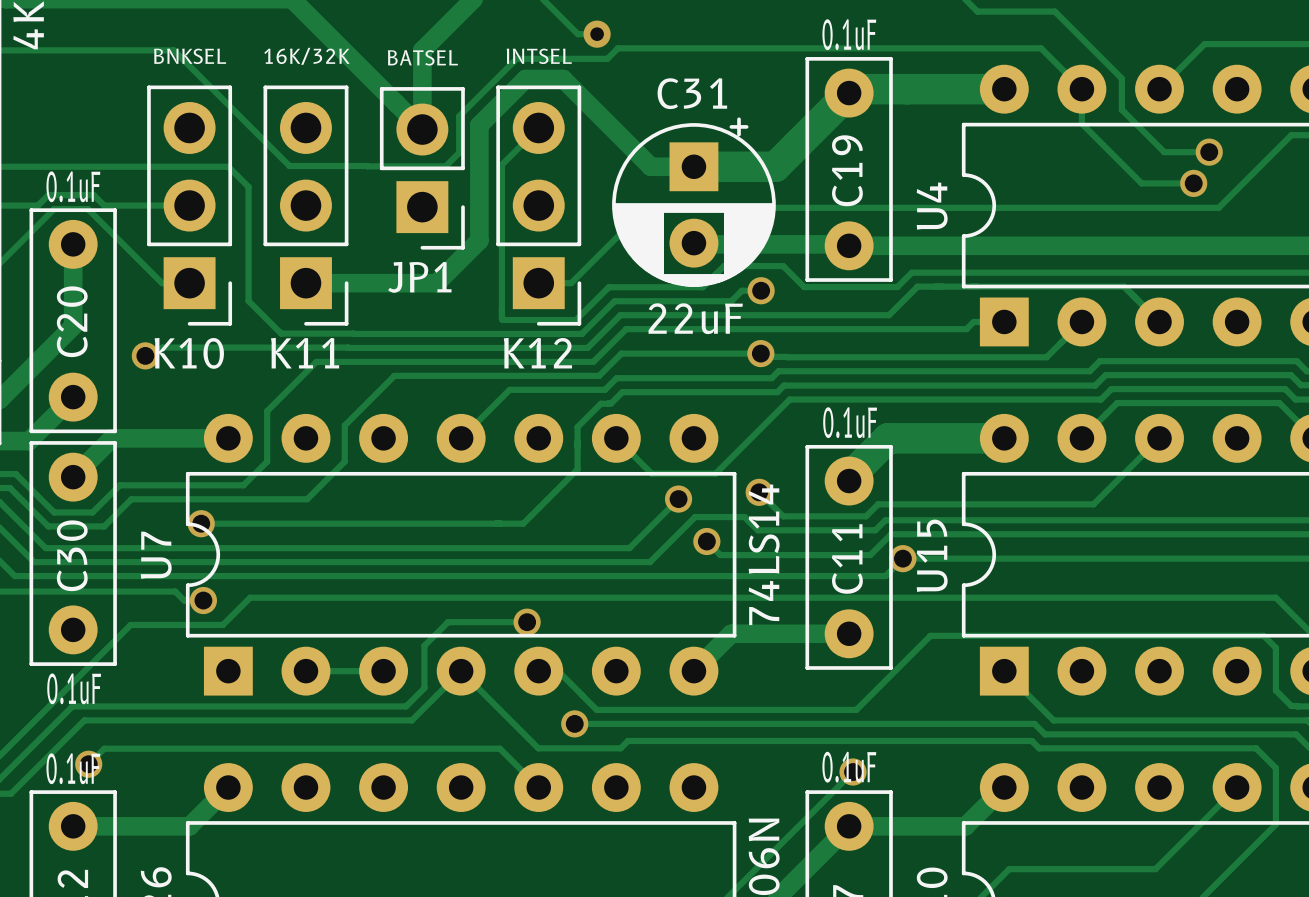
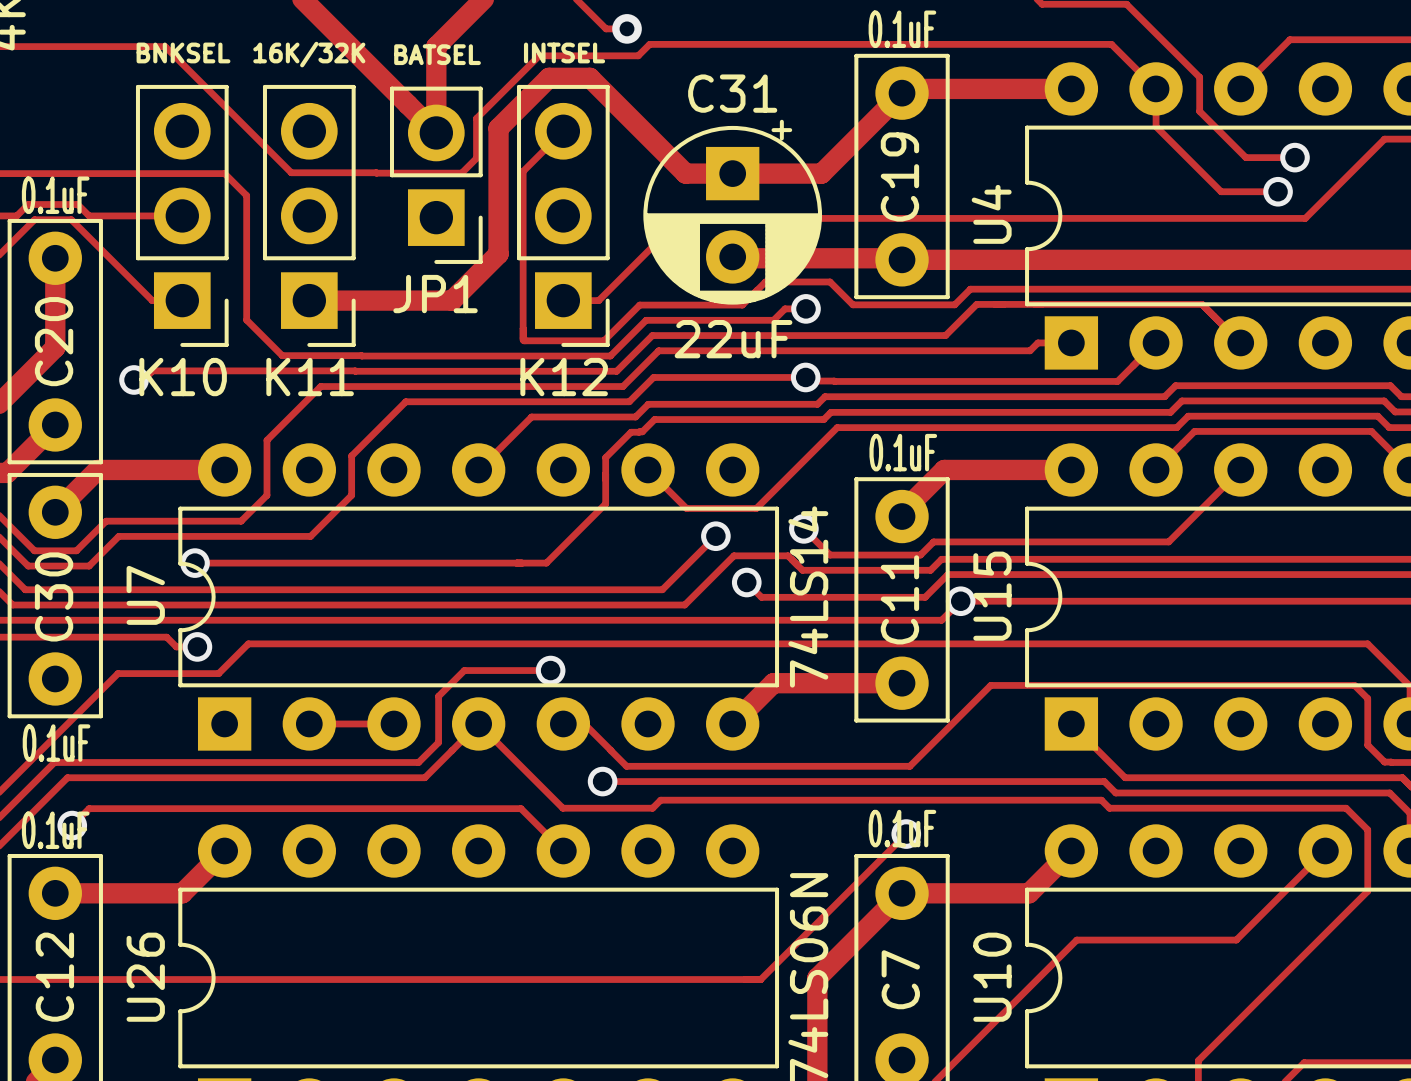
track width: thick (853, 89) (1004, 89) -> thin (906, 88) (1071, 88)
track width: thick (849, 93) (775, 166) (693, 166) -> thin (902, 93) (821, 173) (732, 173)
track width: thick (1004, 438) (887, 438) (849, 477) -> thin (1071, 469) (944, 469) (902, 512)

